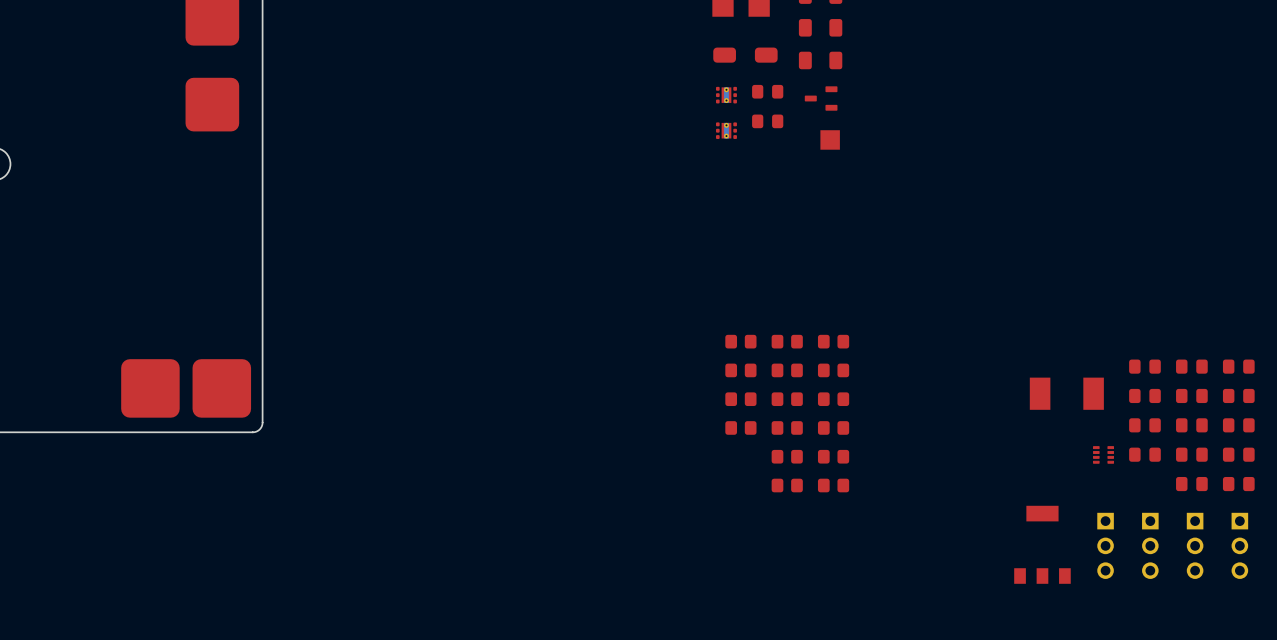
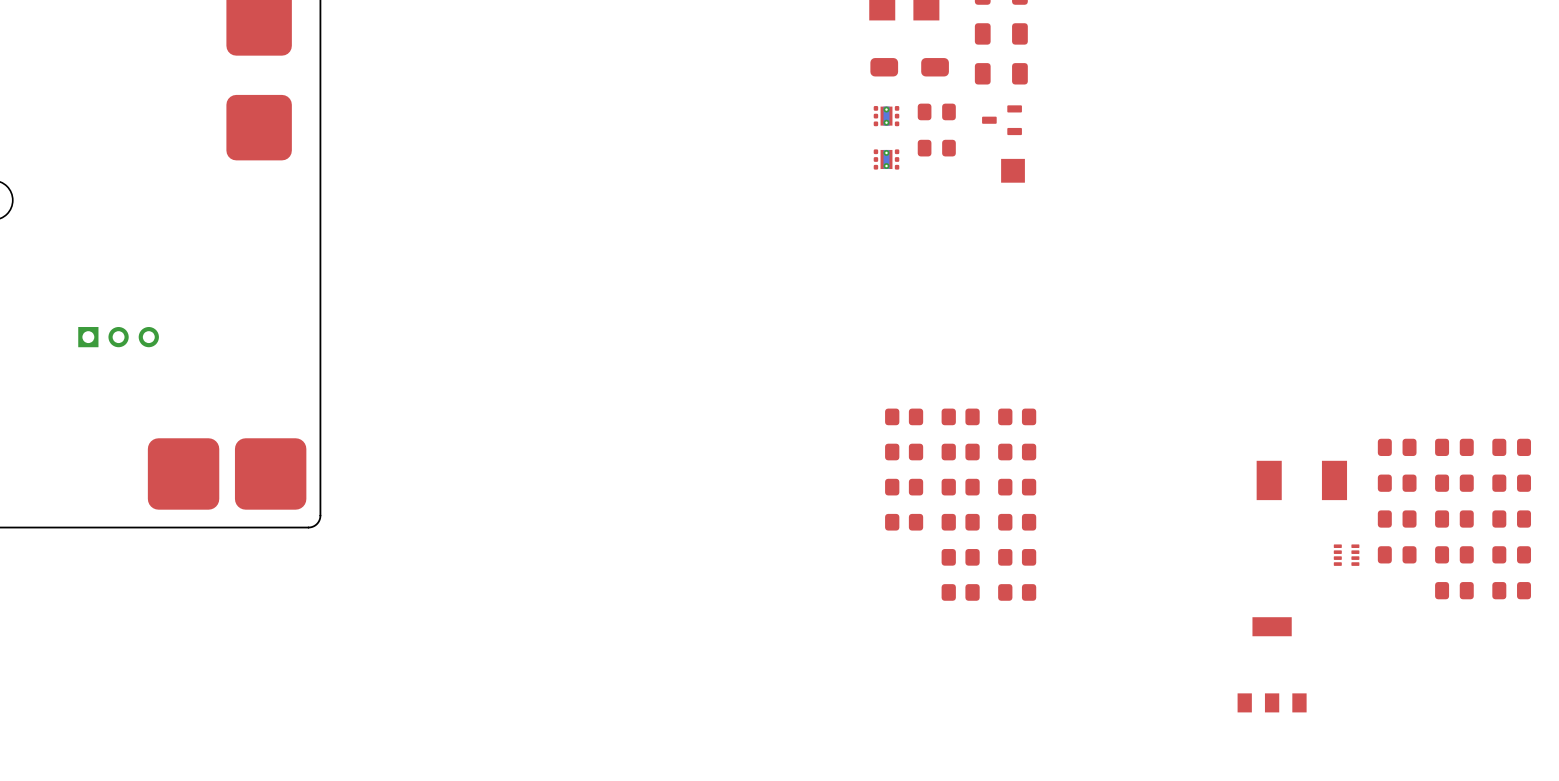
part: none -> (118, 337)
part: (1105, 545) -> none
part: (1150, 545) -> none
part: (1195, 545) -> none
part: (1239, 545) -> none

